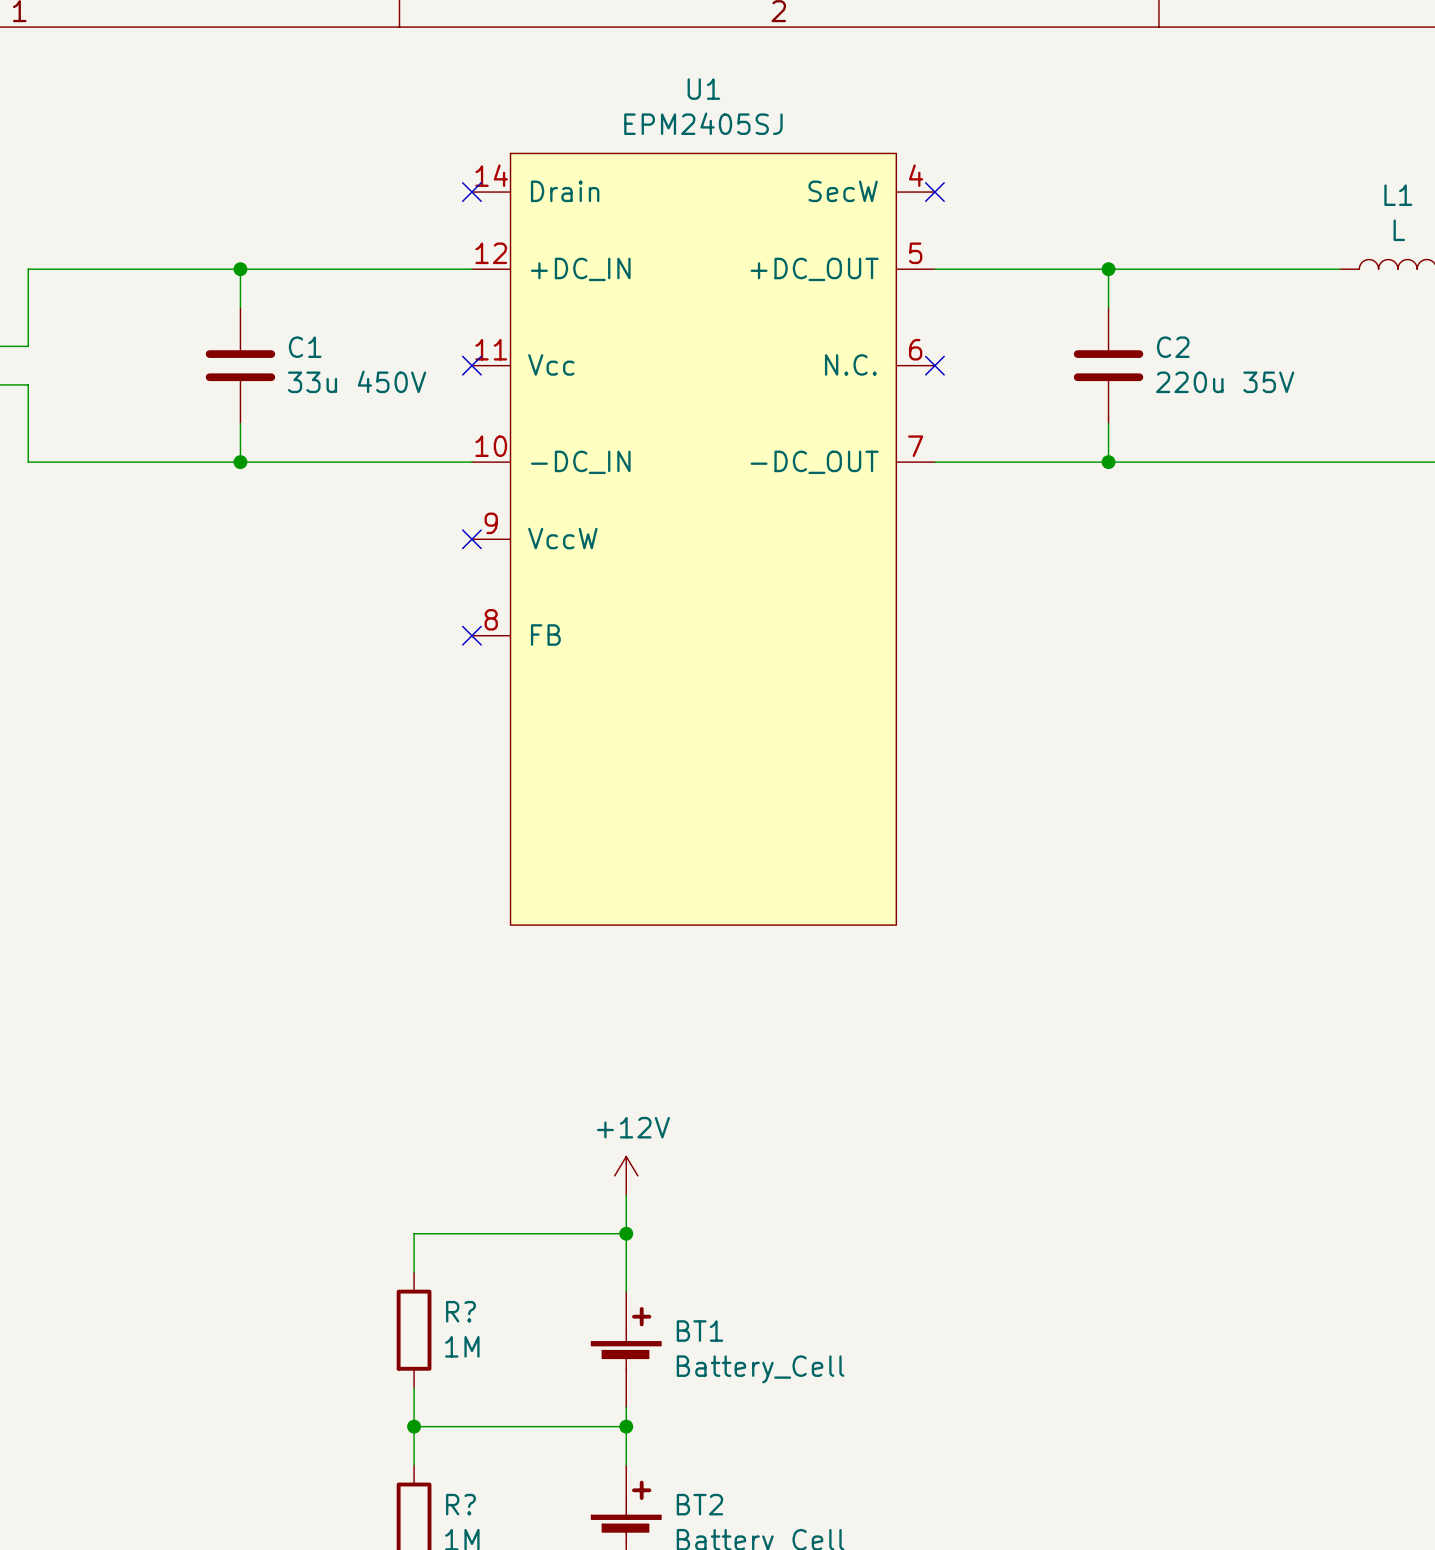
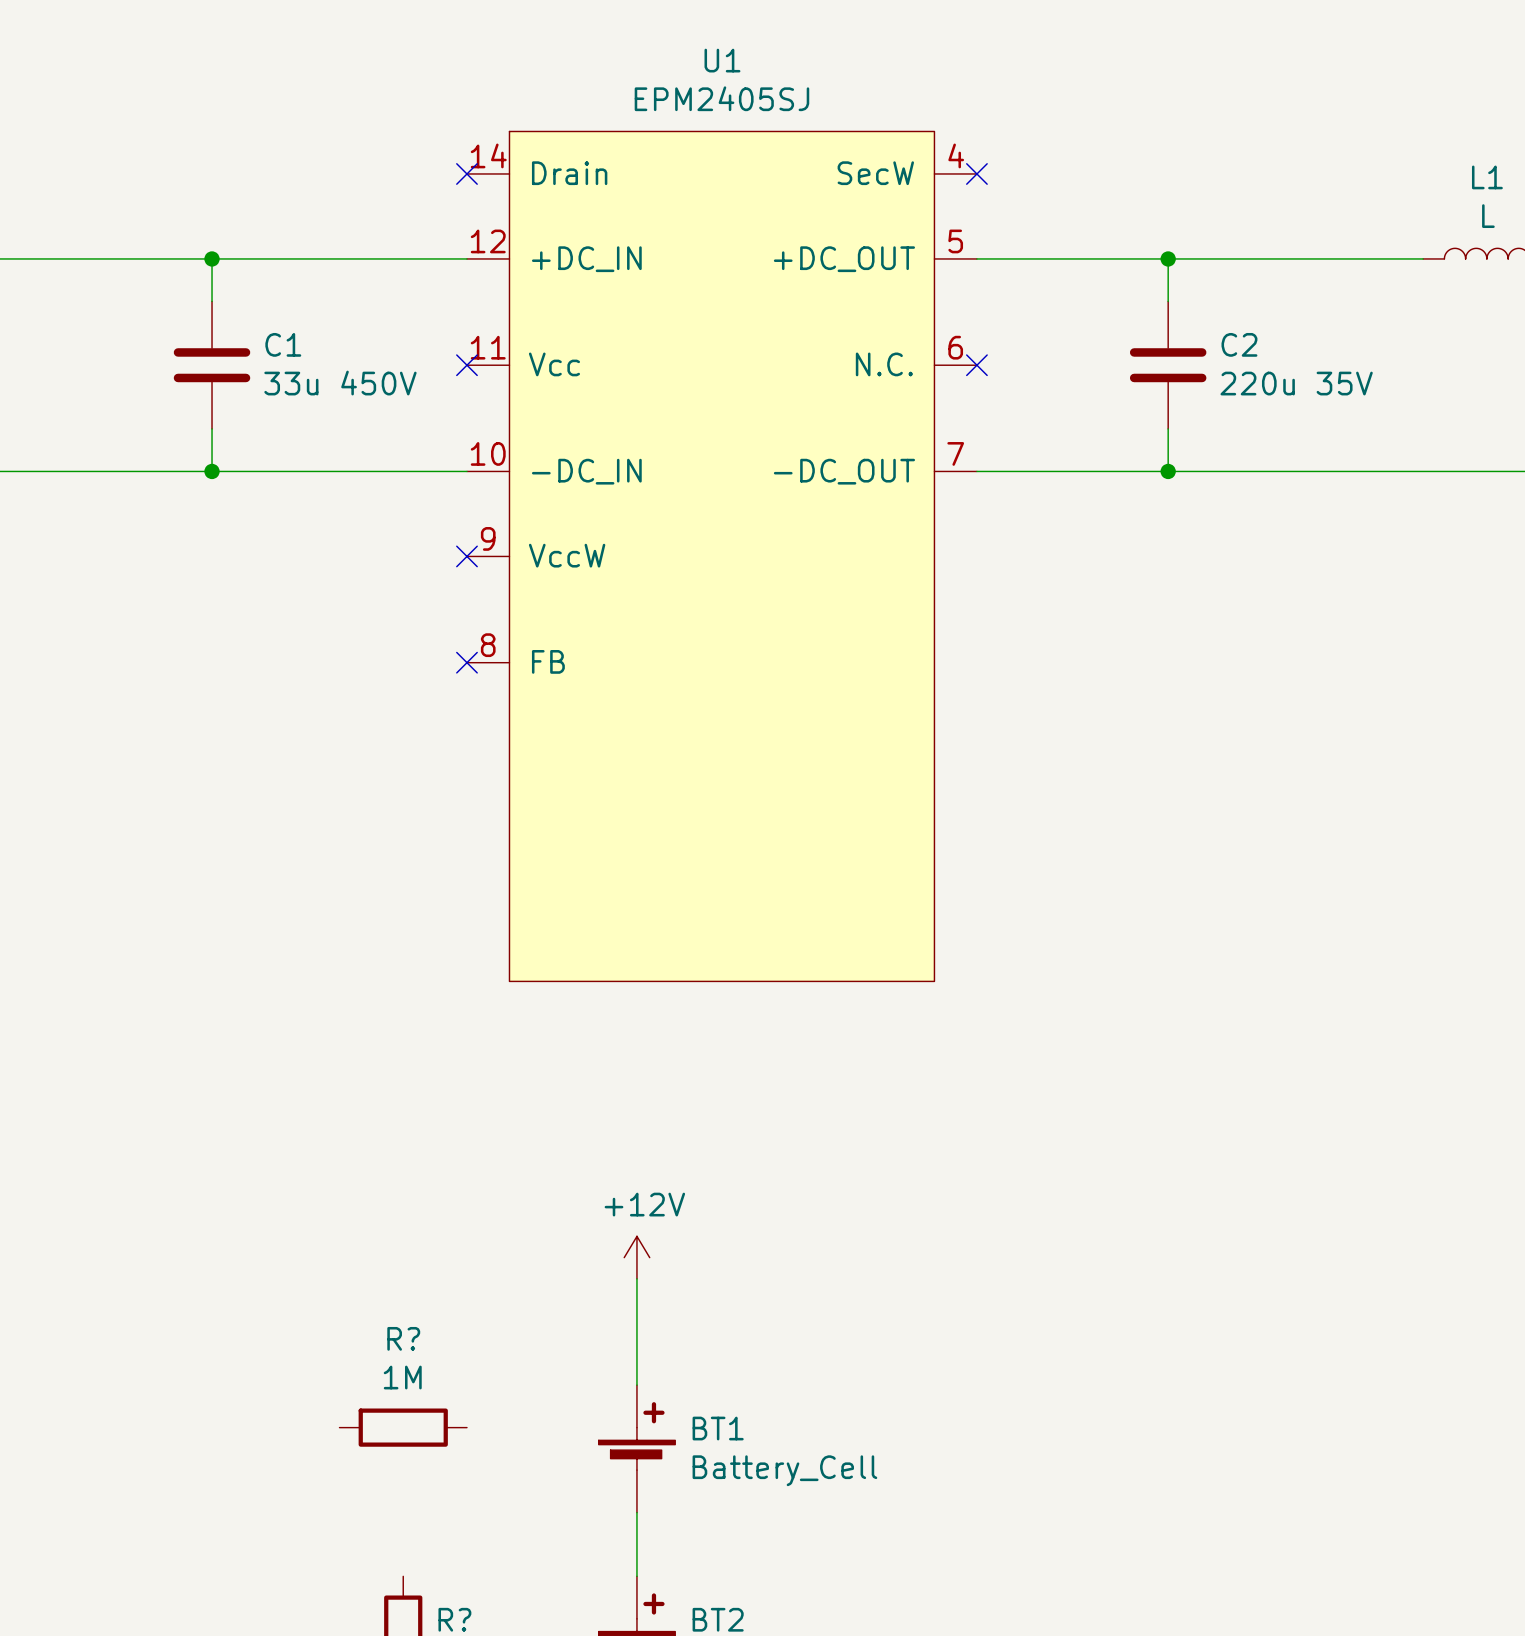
wire: (626, 1233) (414, 1233) (414, 1272) -> none
junction: (626, 1233) -> none
R? name position: R? (460, 1311) -> R? (403, 1338)
R? rotation: 0° (414, 1330) -> 90° clockwise (403, 1427)
R? value position: 1M (462, 1346) -> 1M (402, 1377)
wire: (414, 1388) (414, 1465) -> none
wire: (414, 1426) (626, 1426) -> none
junction: (414, 1426) -> none
junction: (626, 1426) -> none

